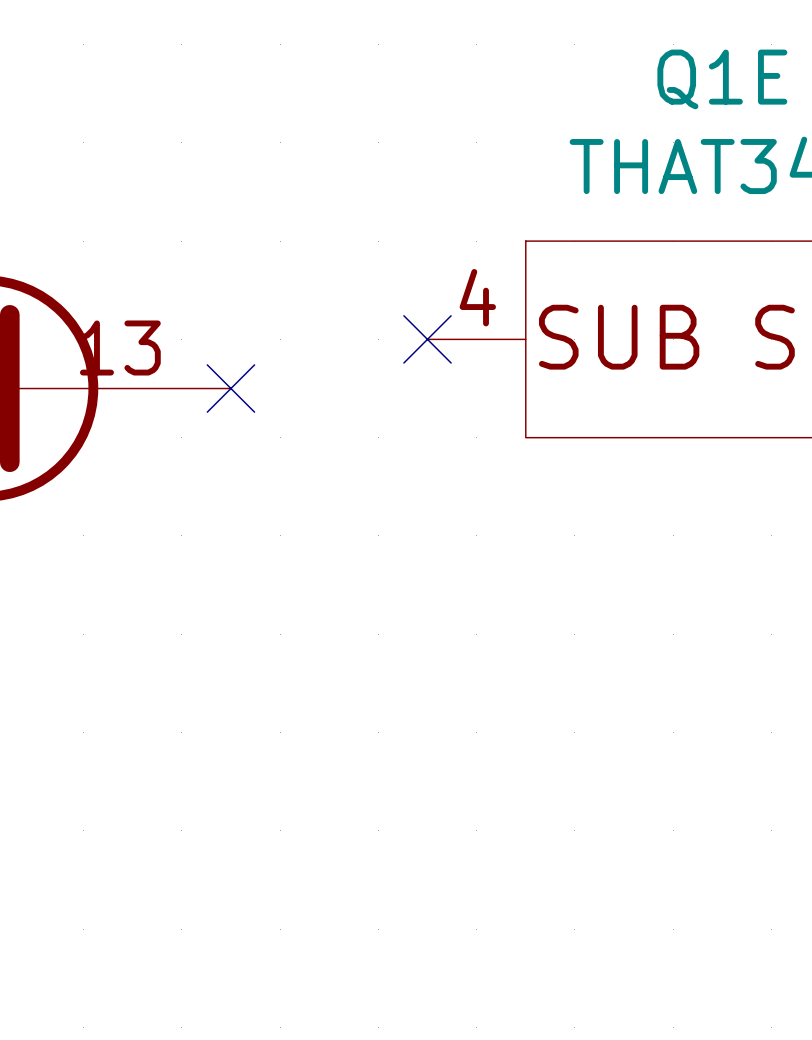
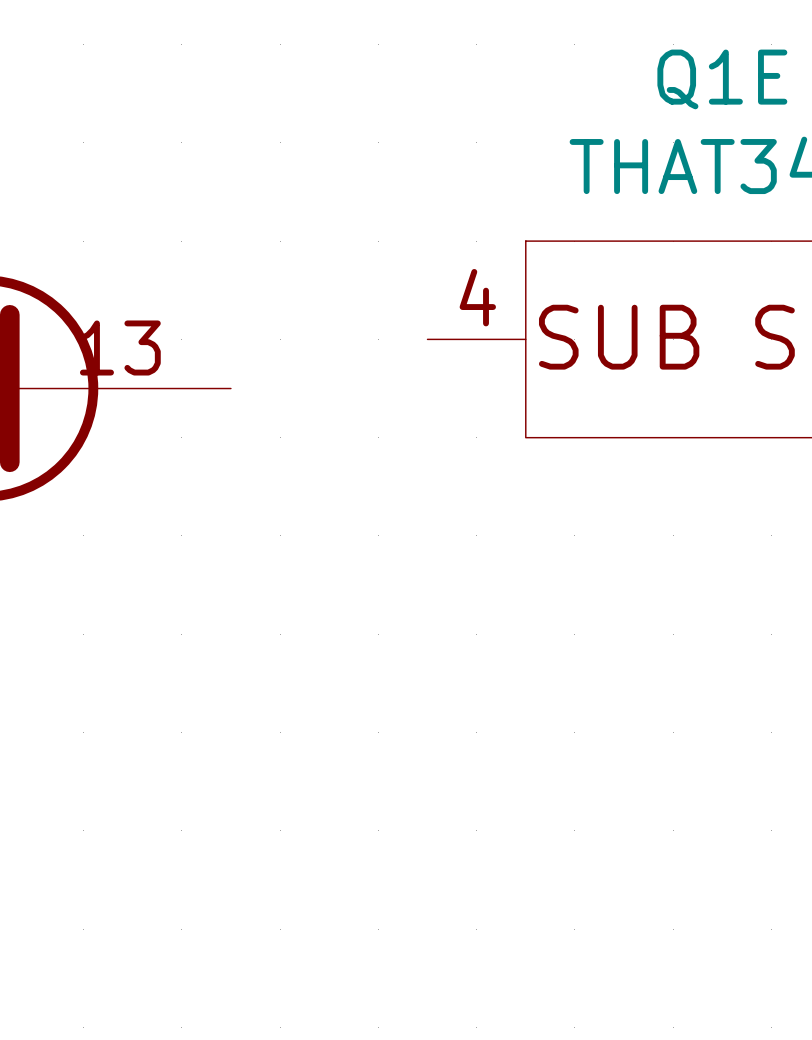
no-connect mark: (427, 339) -> none
no-connect mark: (230, 388) -> none

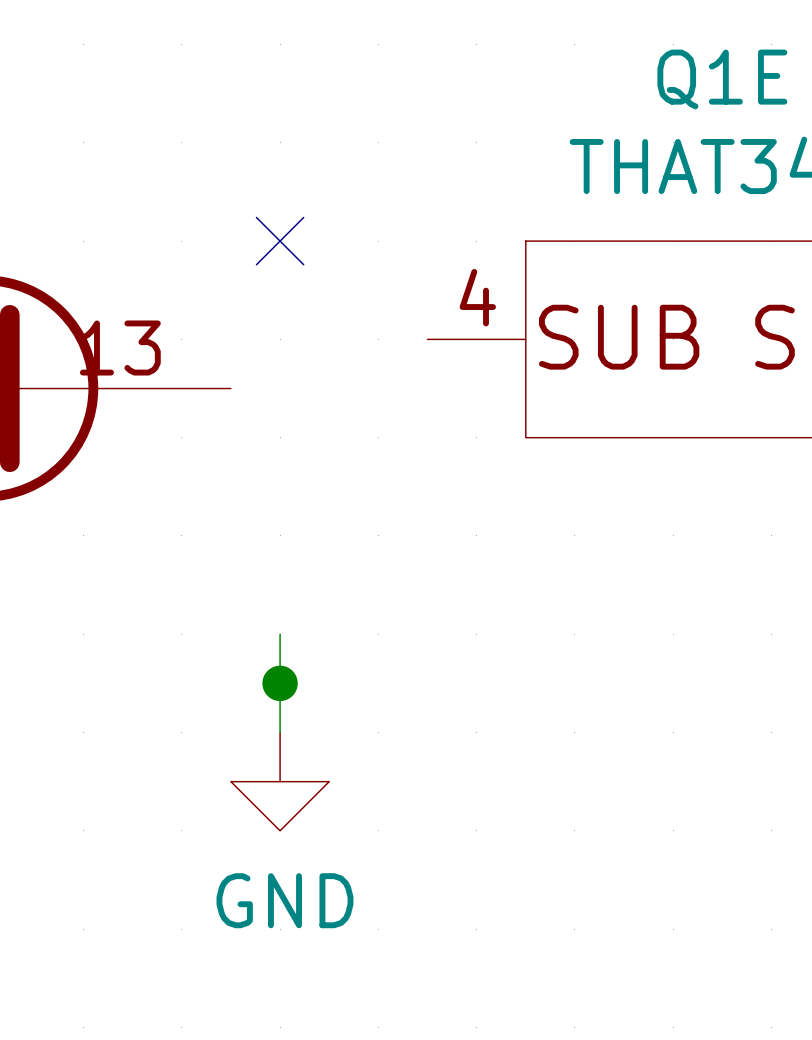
no-connect mark: none -> (280, 241)
wire: none -> (280, 634) (280, 732)
junction: none -> (280, 683)
power symbol: none -> GND (280, 781)

